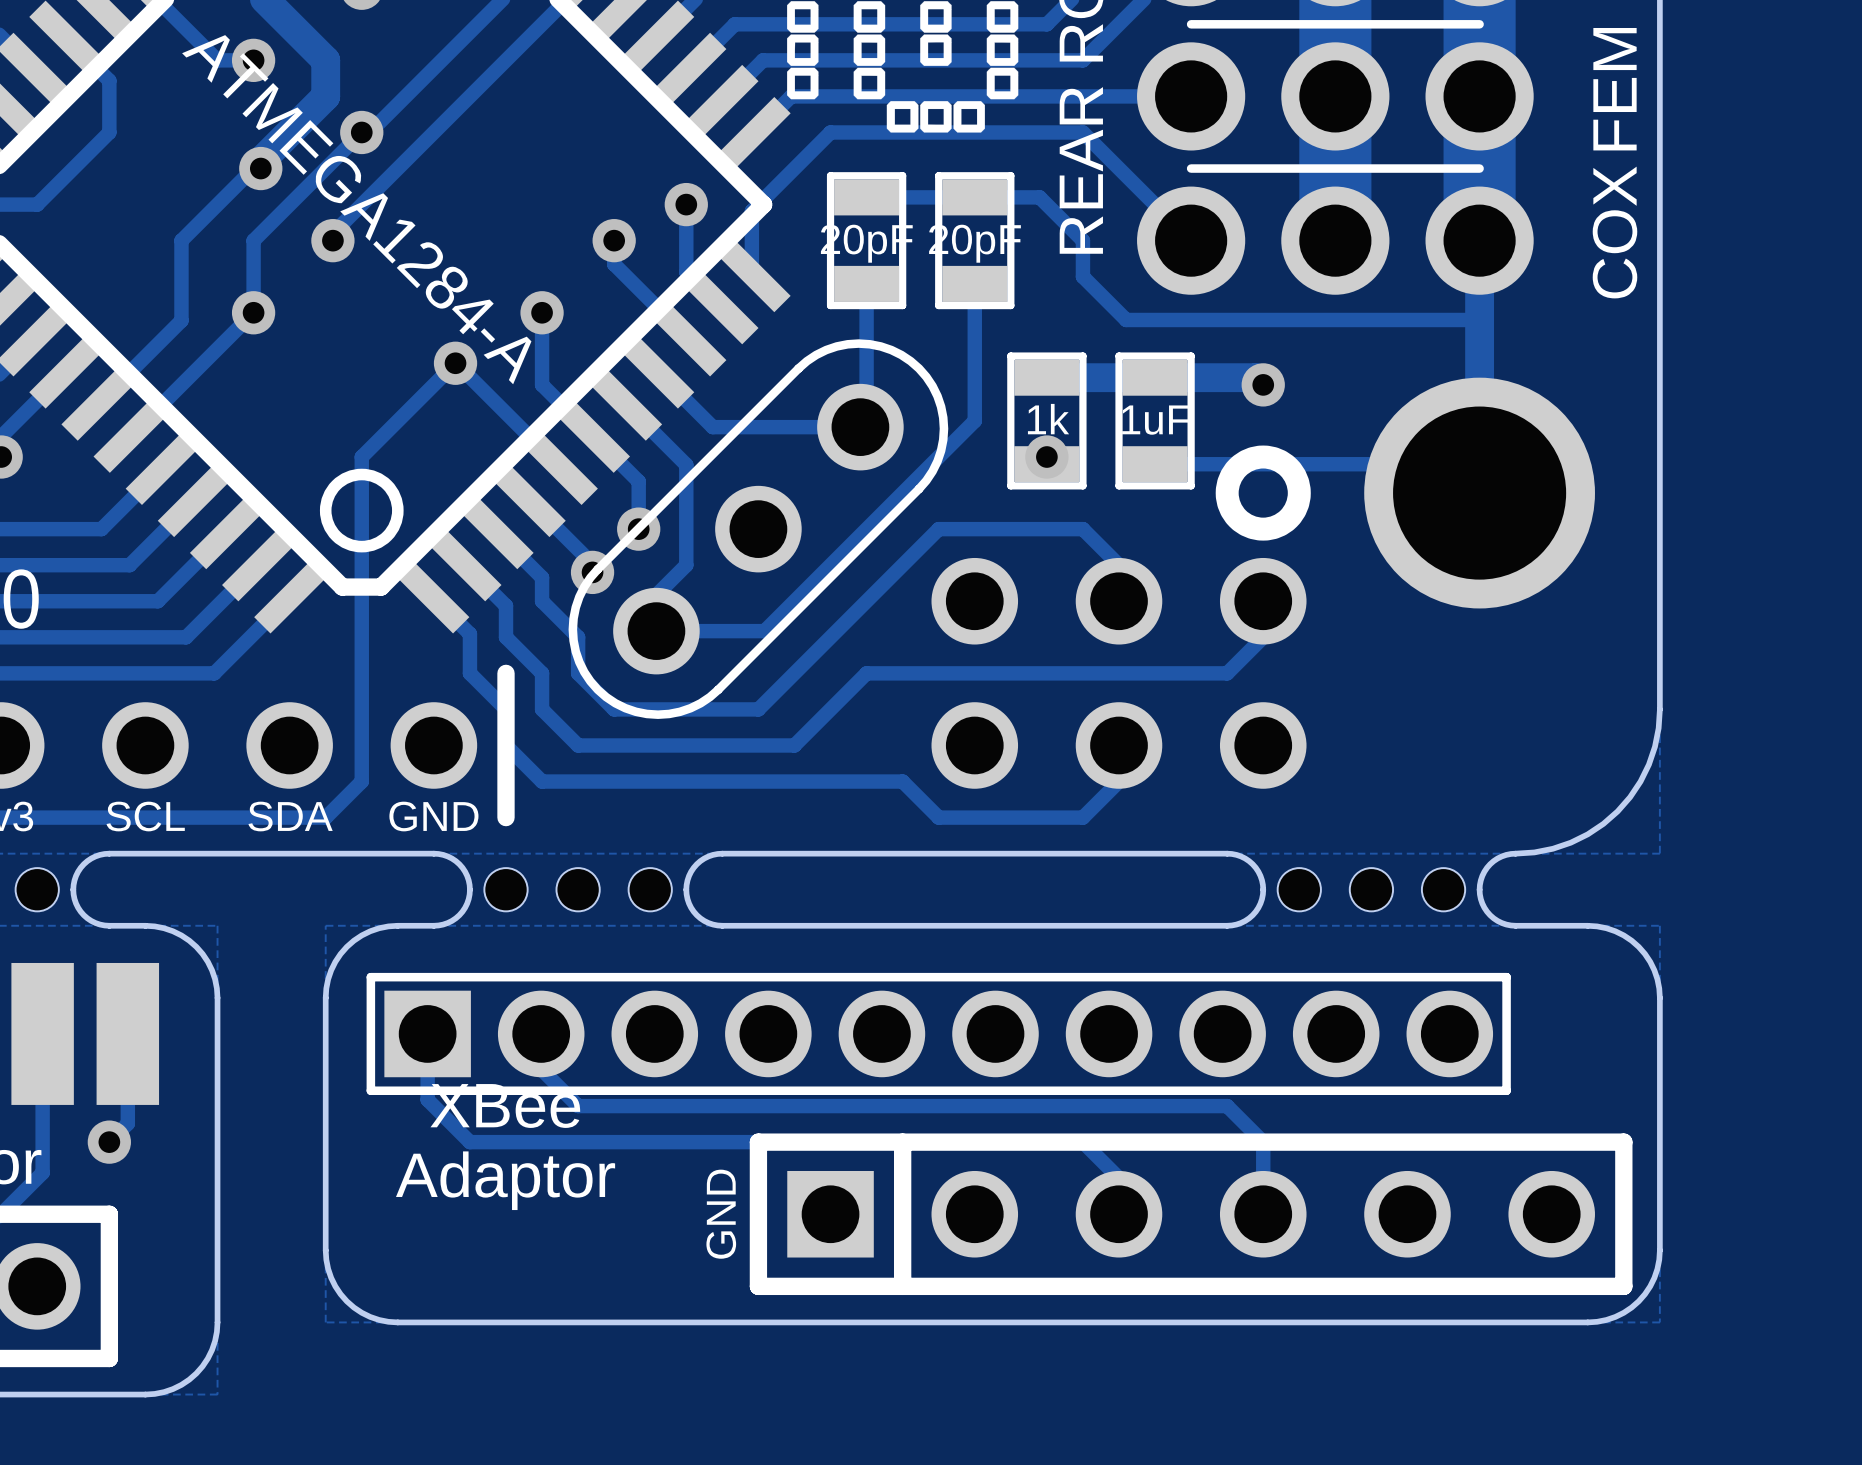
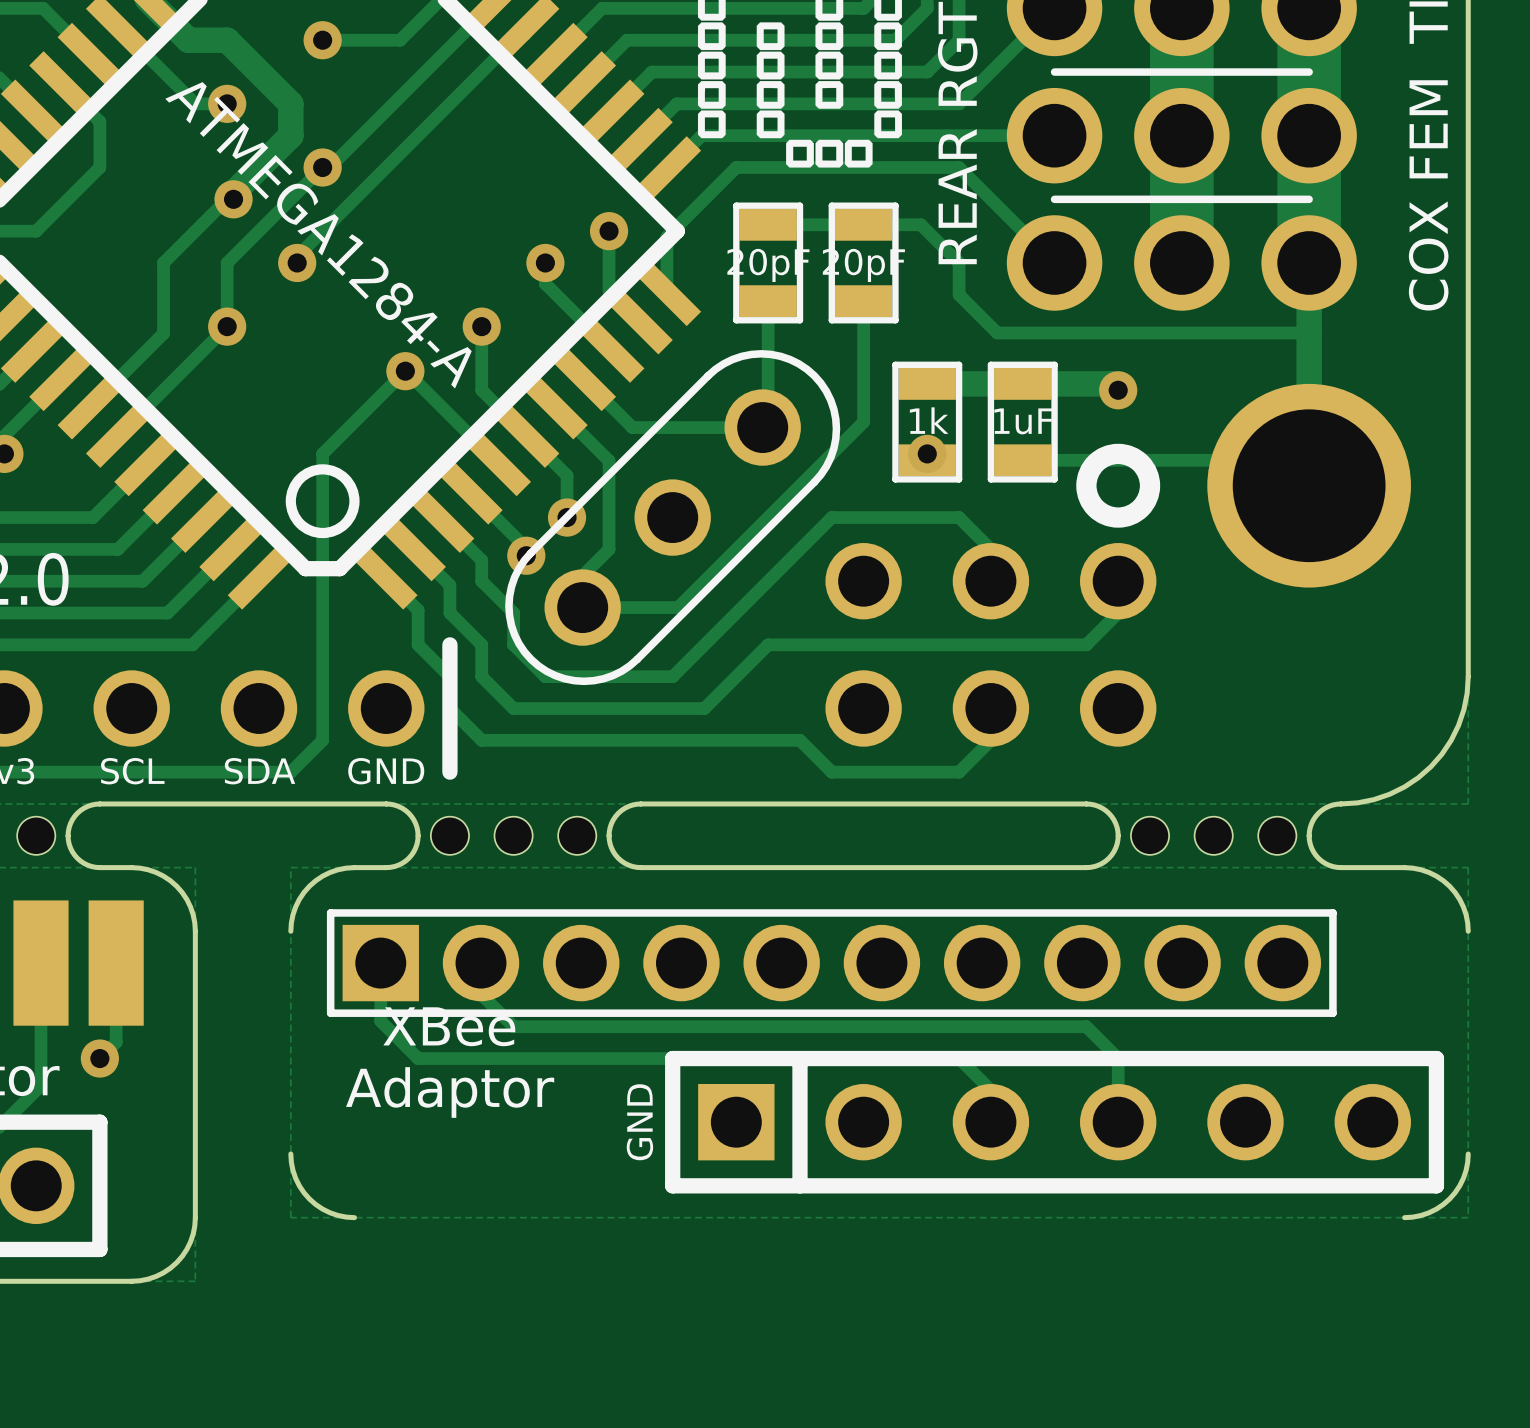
board edge: (325, 997) (325, 1250) -> none
board edge: (1659, 997) (1659, 1250) -> none
board edge: (397, 1322) (1587, 1322) -> none

